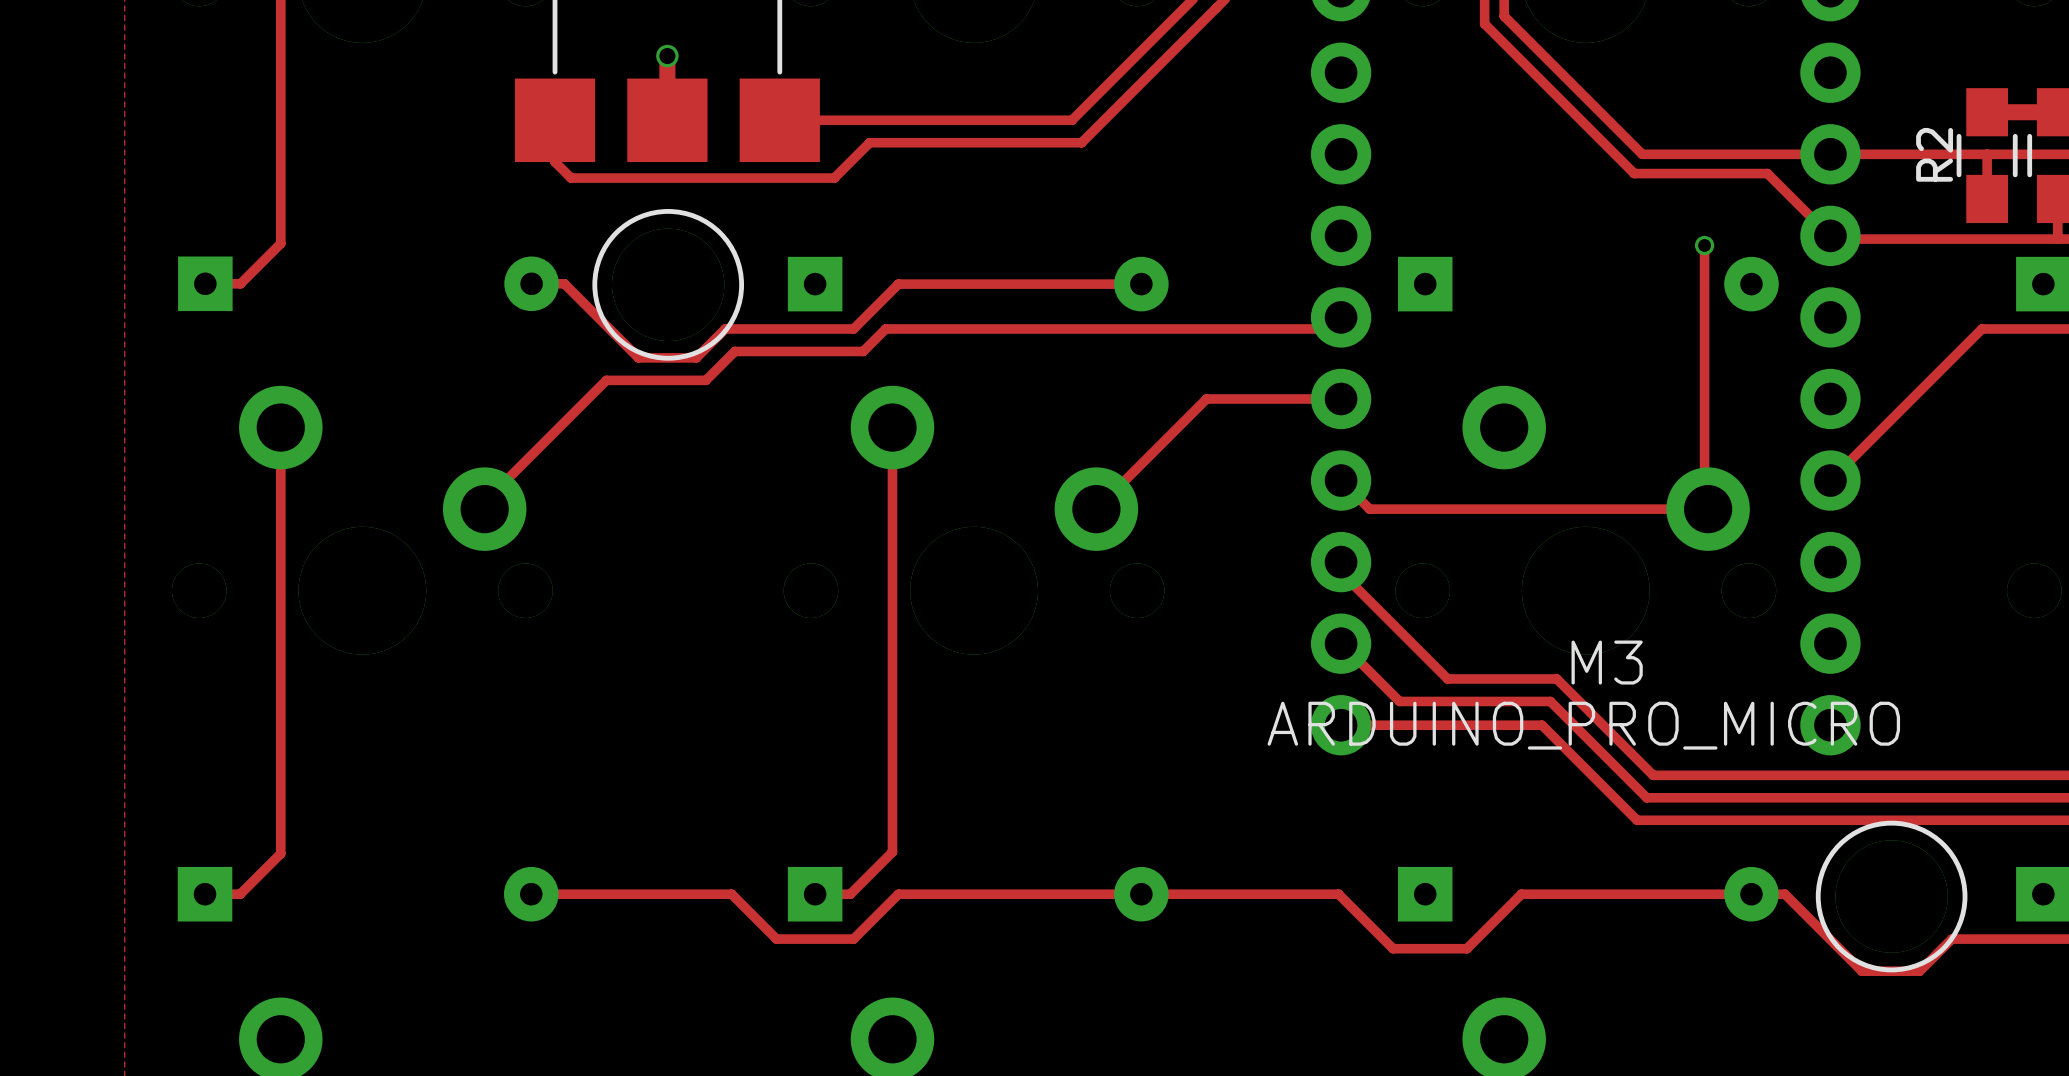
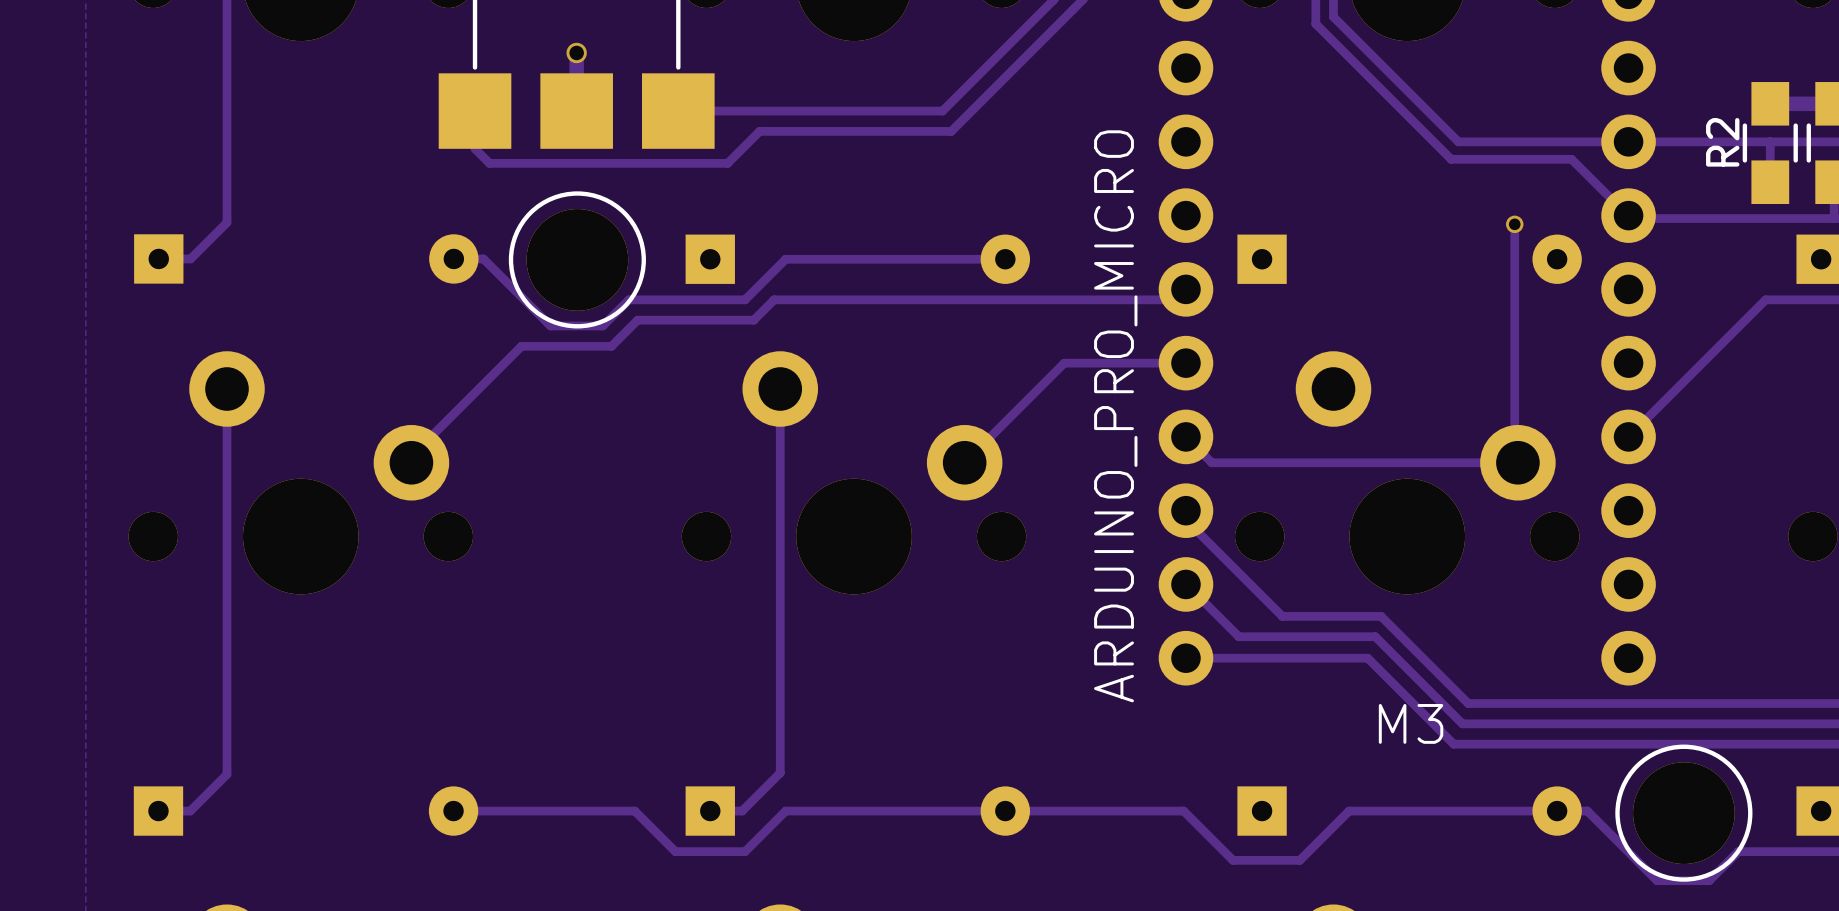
M3 name position: M3 (1607, 662) -> M3 (1411, 723)
M3 value rotation: 0° (1583, 725) -> 90° counterclockwise (1115, 416)

